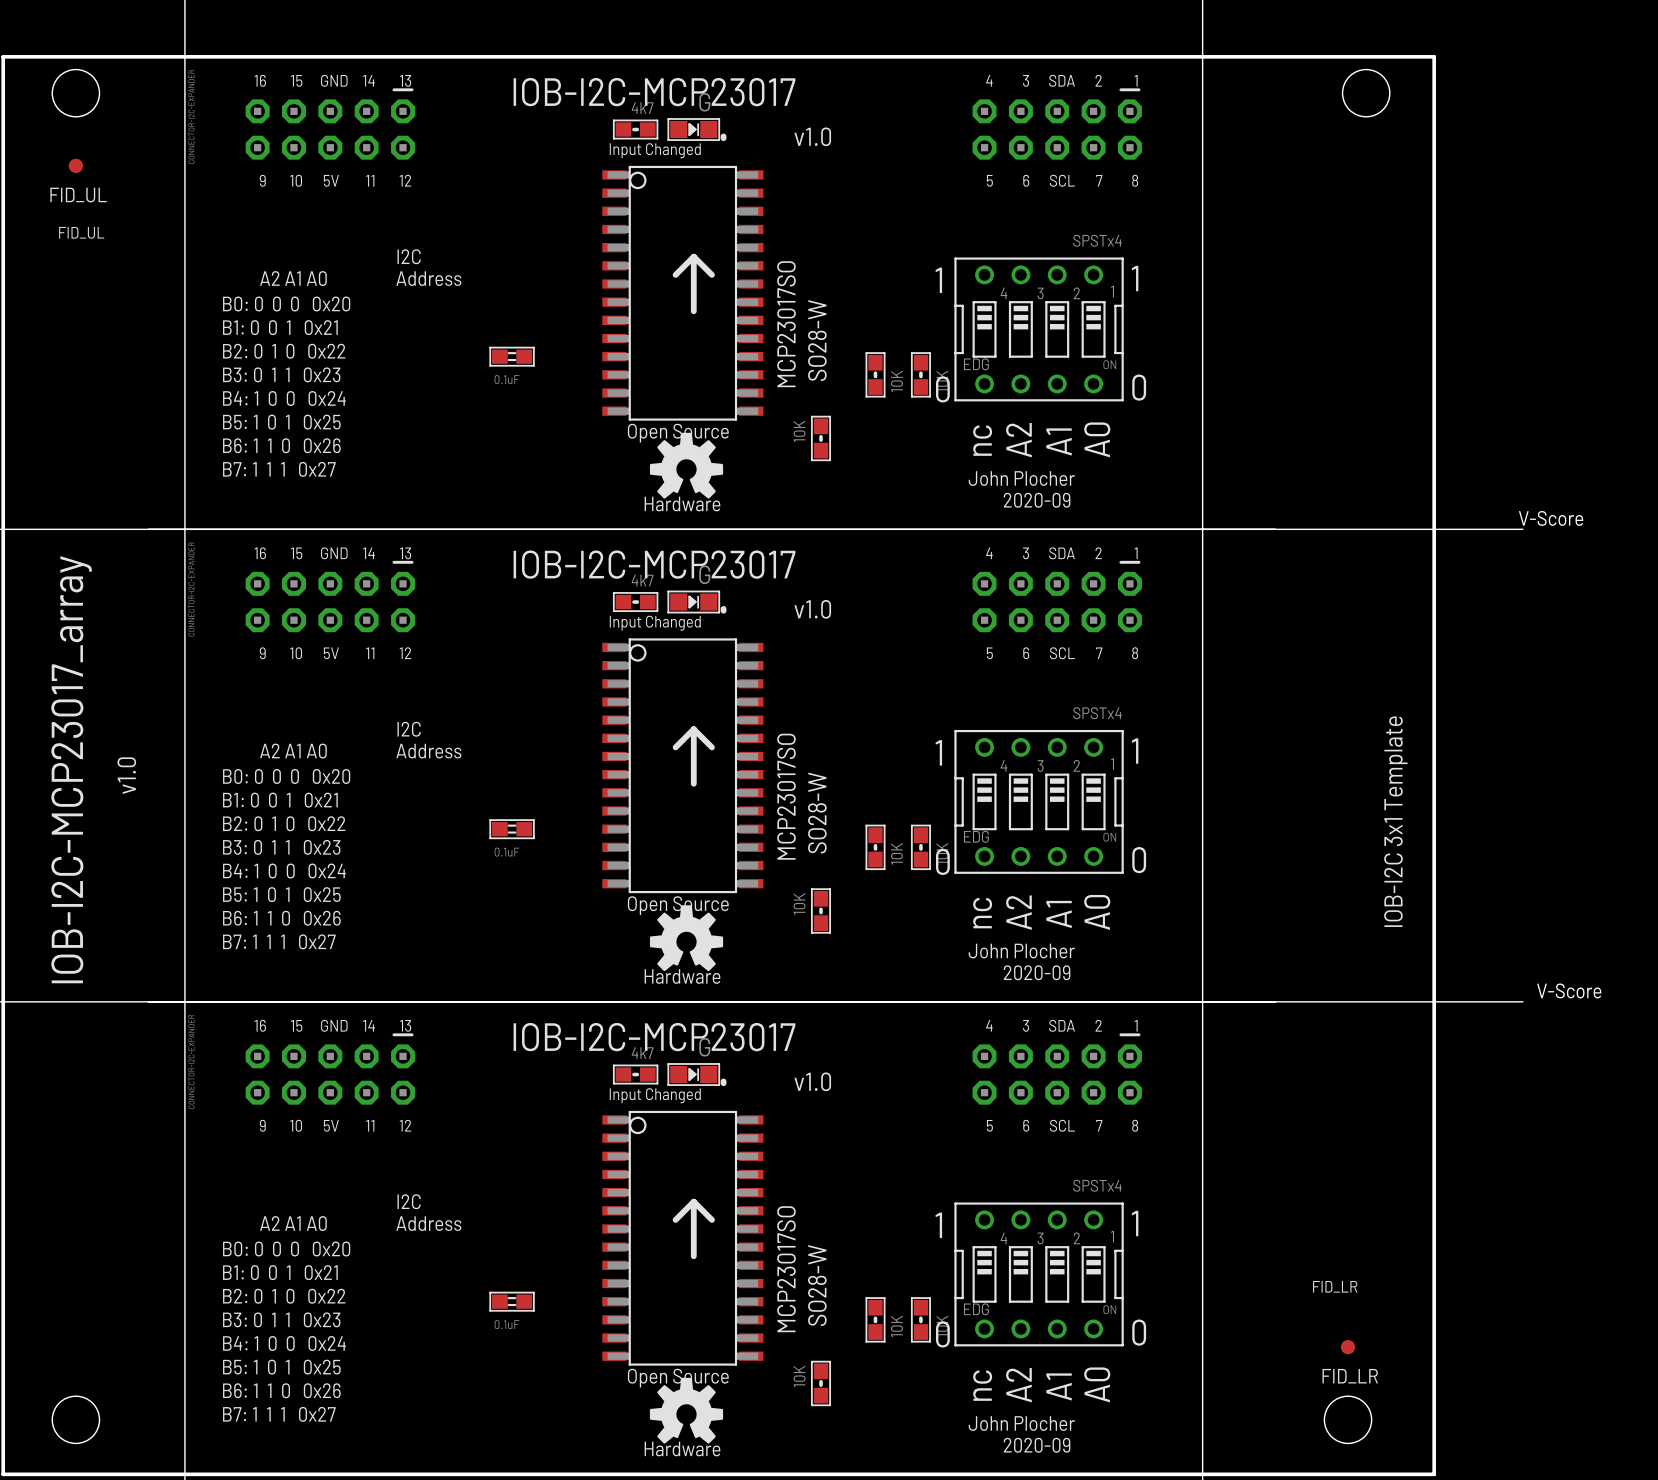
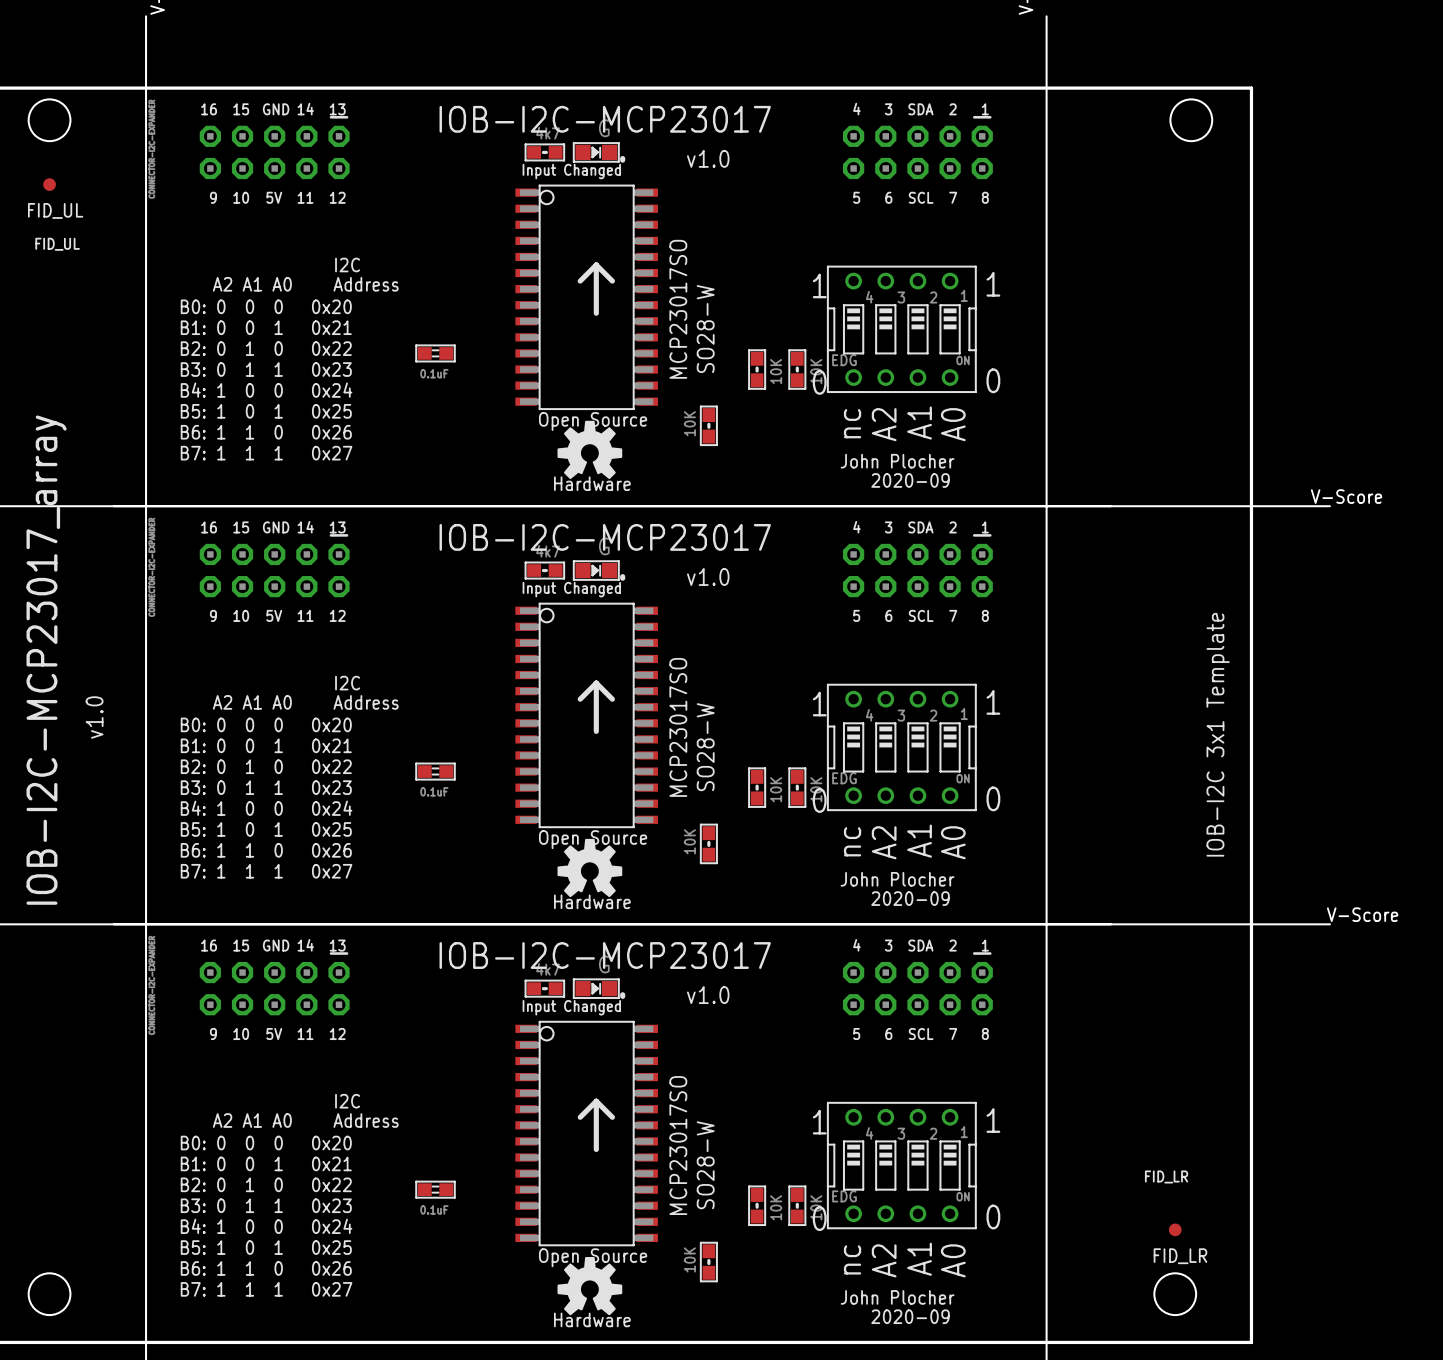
part value: SPSTx4 (1097, 240) -> none
part value: SPSTx4 (1097, 713) -> none
part value: SPSTx4 (1097, 1185) -> none

